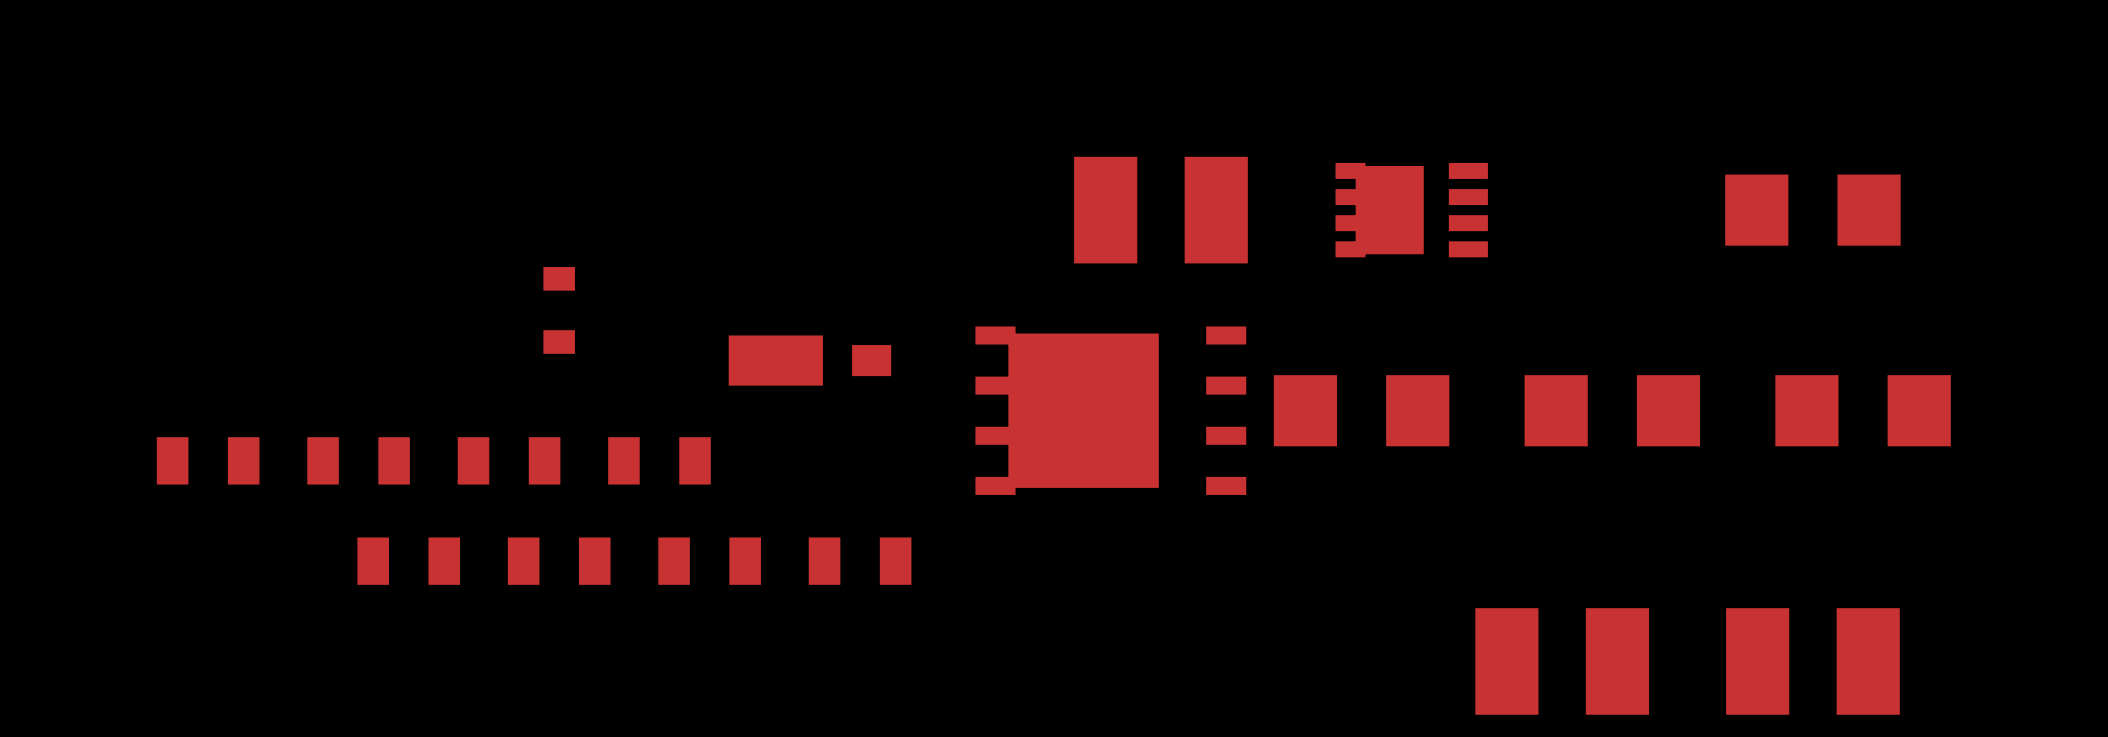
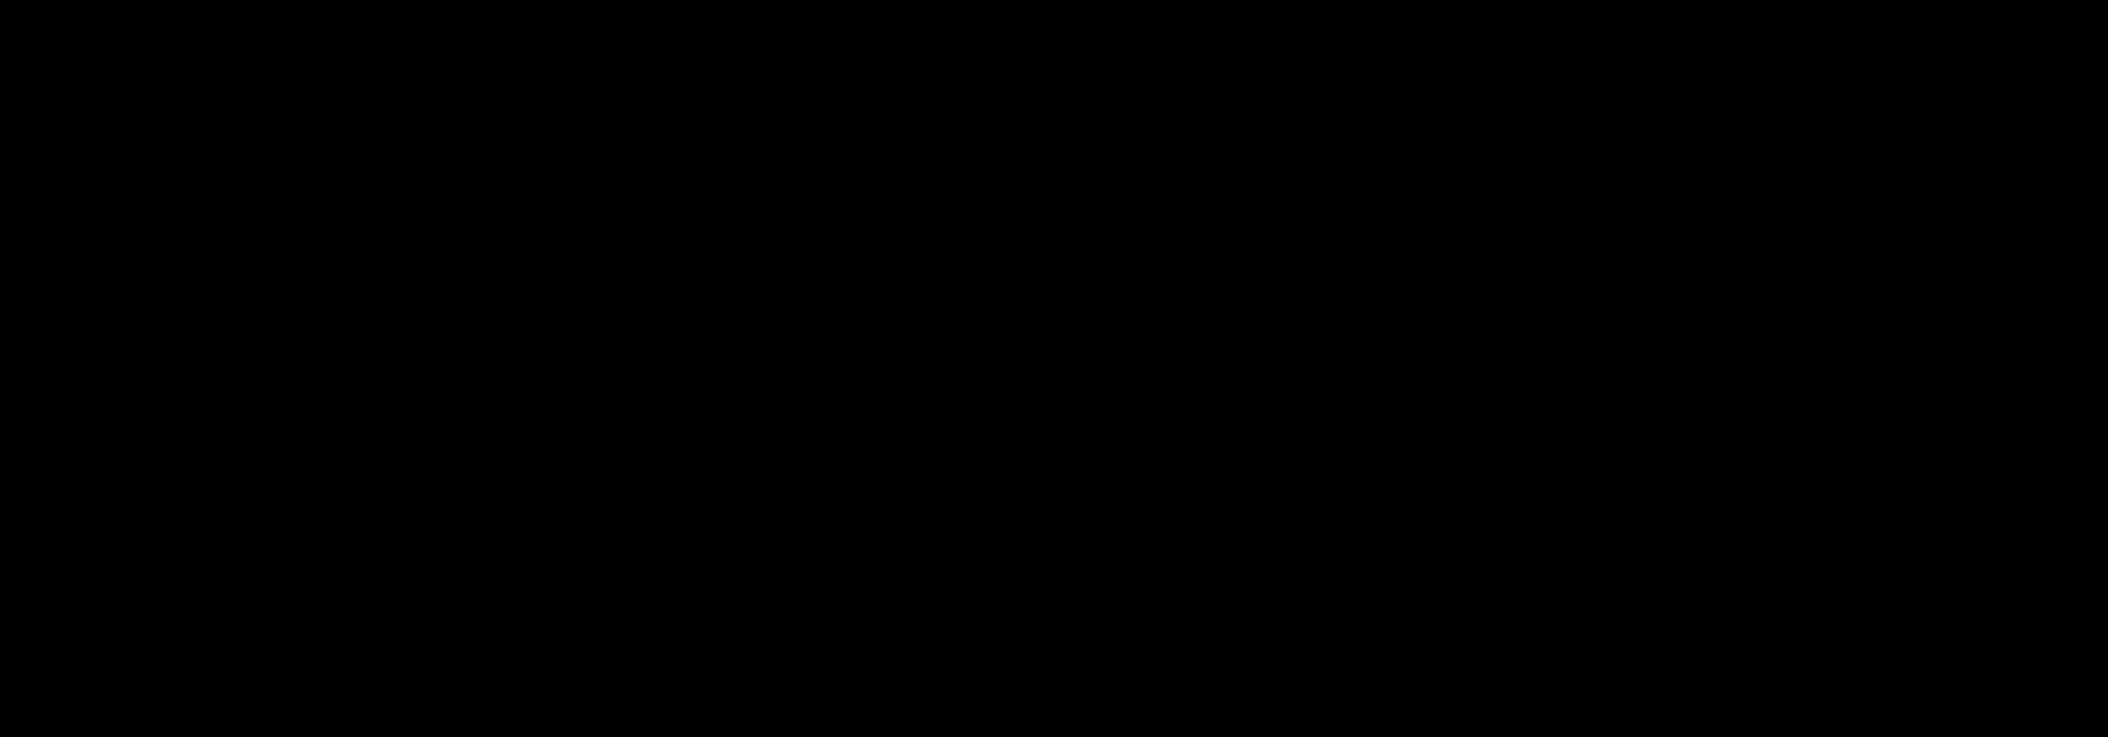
part: (1160, 210) -> none
part: (1411, 210) -> none
part: (1812, 210) -> none
part: (559, 310) -> none
part: (809, 360) -> none
part: (1110, 410) -> none
part: (1361, 410) -> none
part: (1612, 410) -> none
part: (1863, 410) -> none
part: (208, 460) -> none
part: (358, 460) -> none
part: (509, 460) -> none
part: (659, 460) -> none
part: (408, 561) -> none
part: (559, 561) -> none
part: (709, 561) -> none
part: (860, 561) -> none
part: (1562, 661) -> none
part: (1812, 661) -> none

